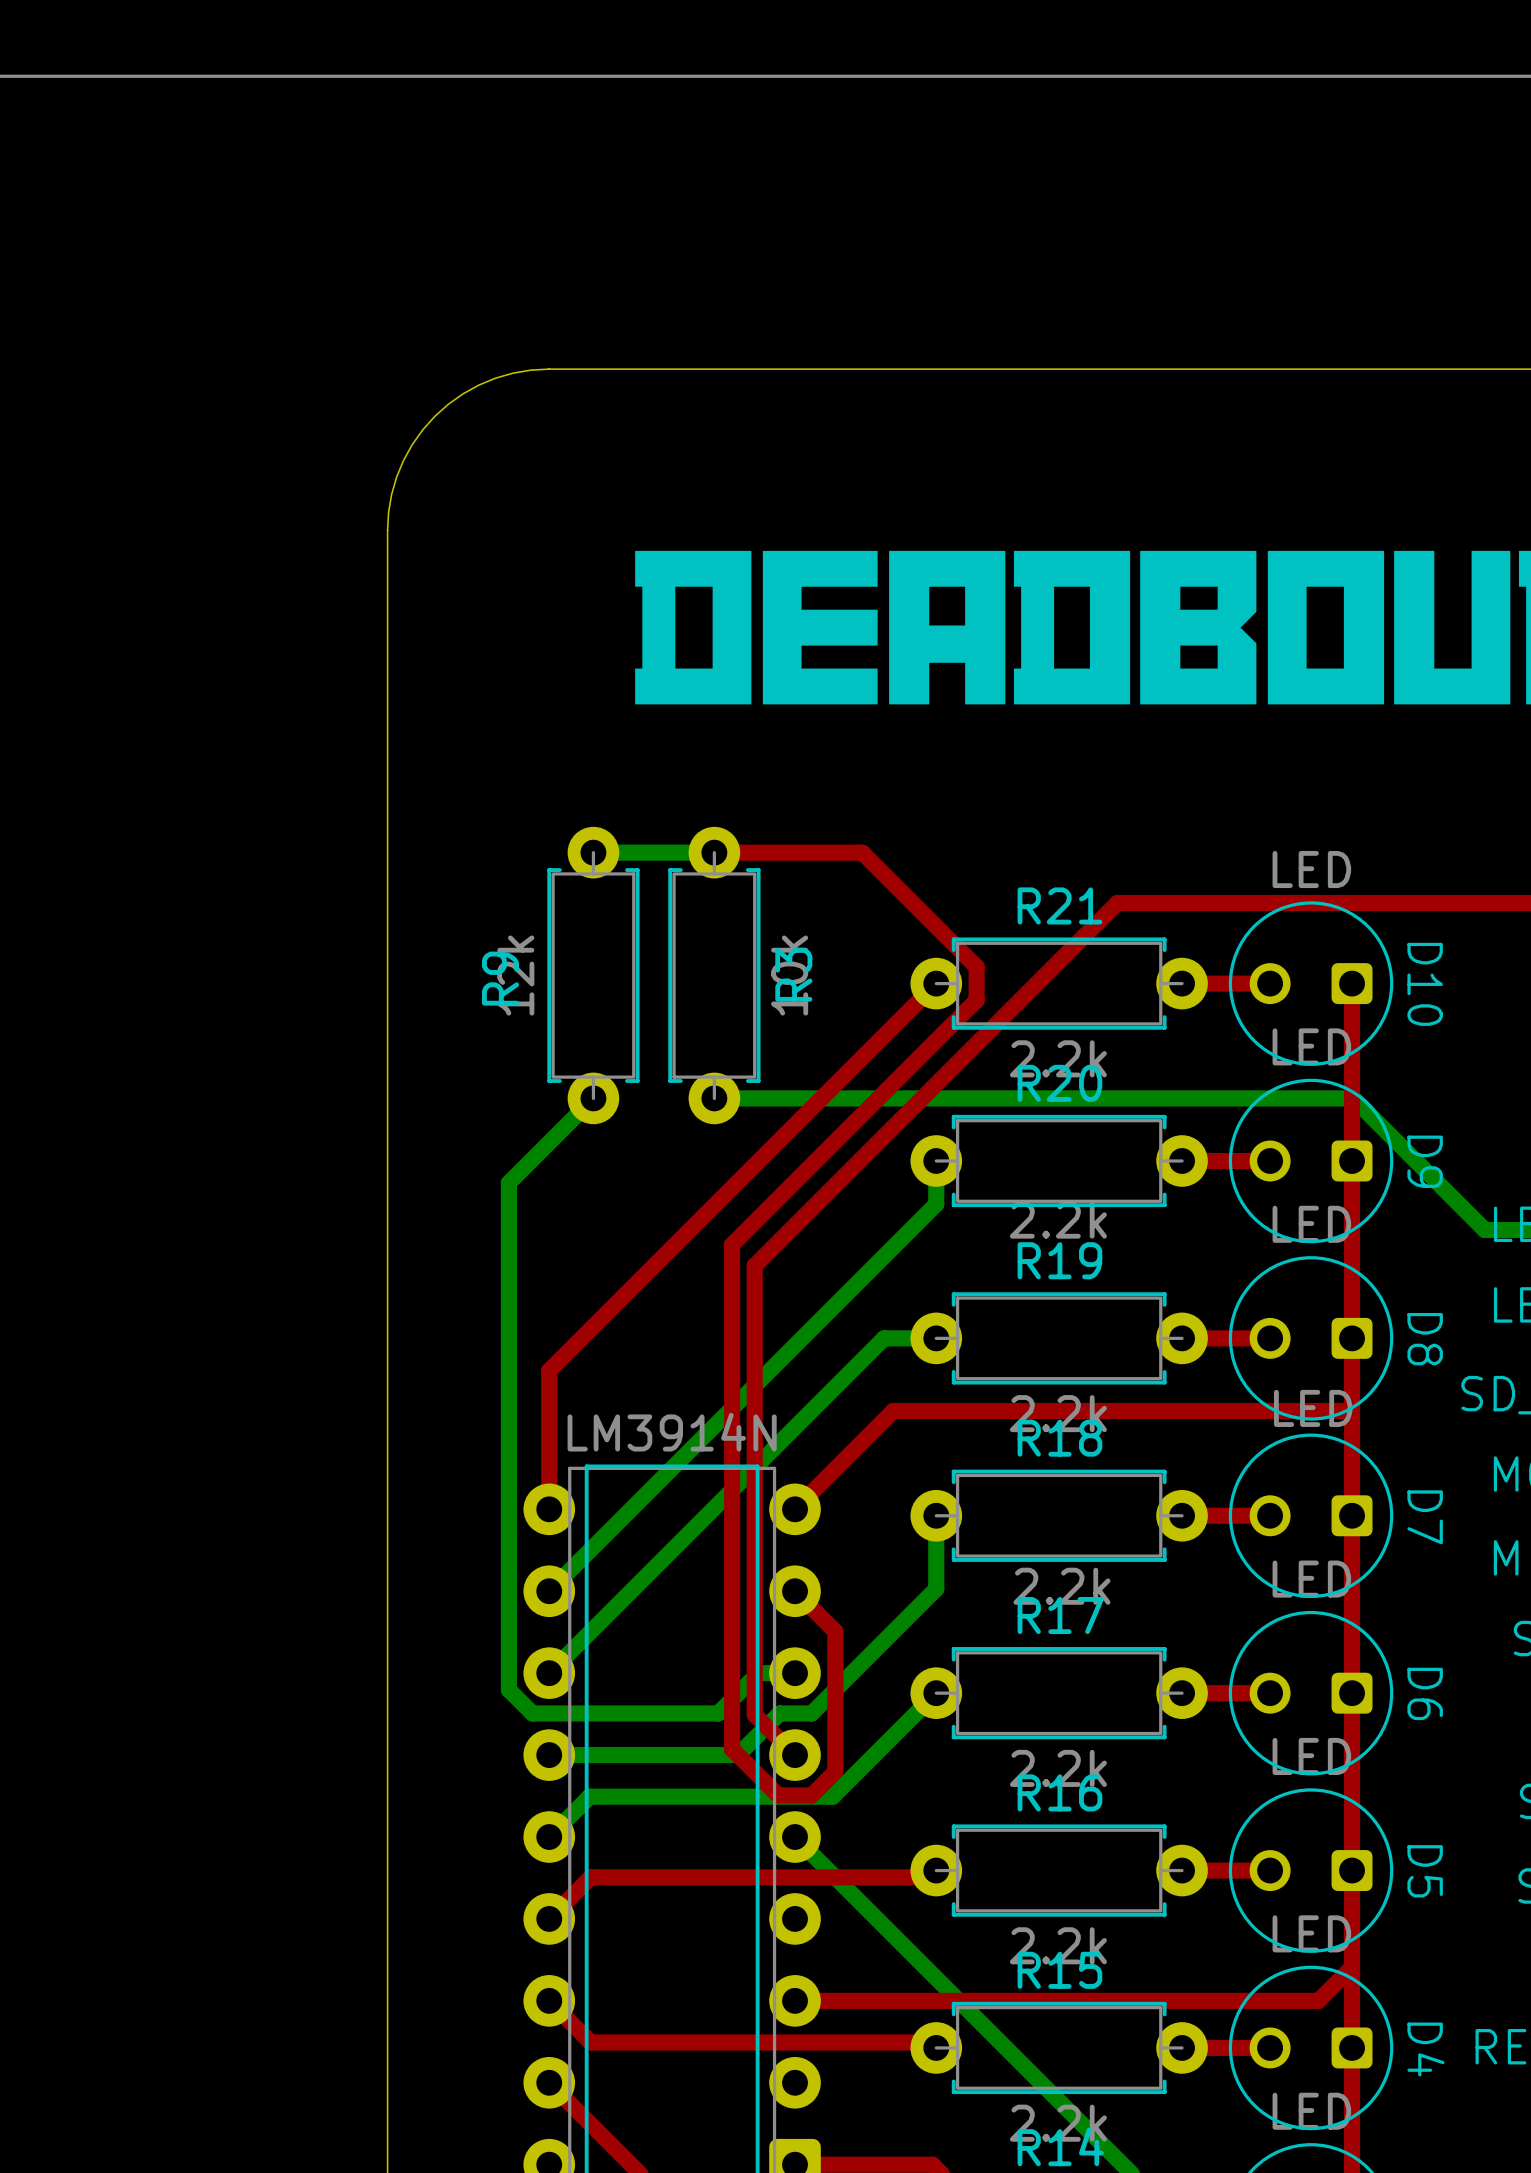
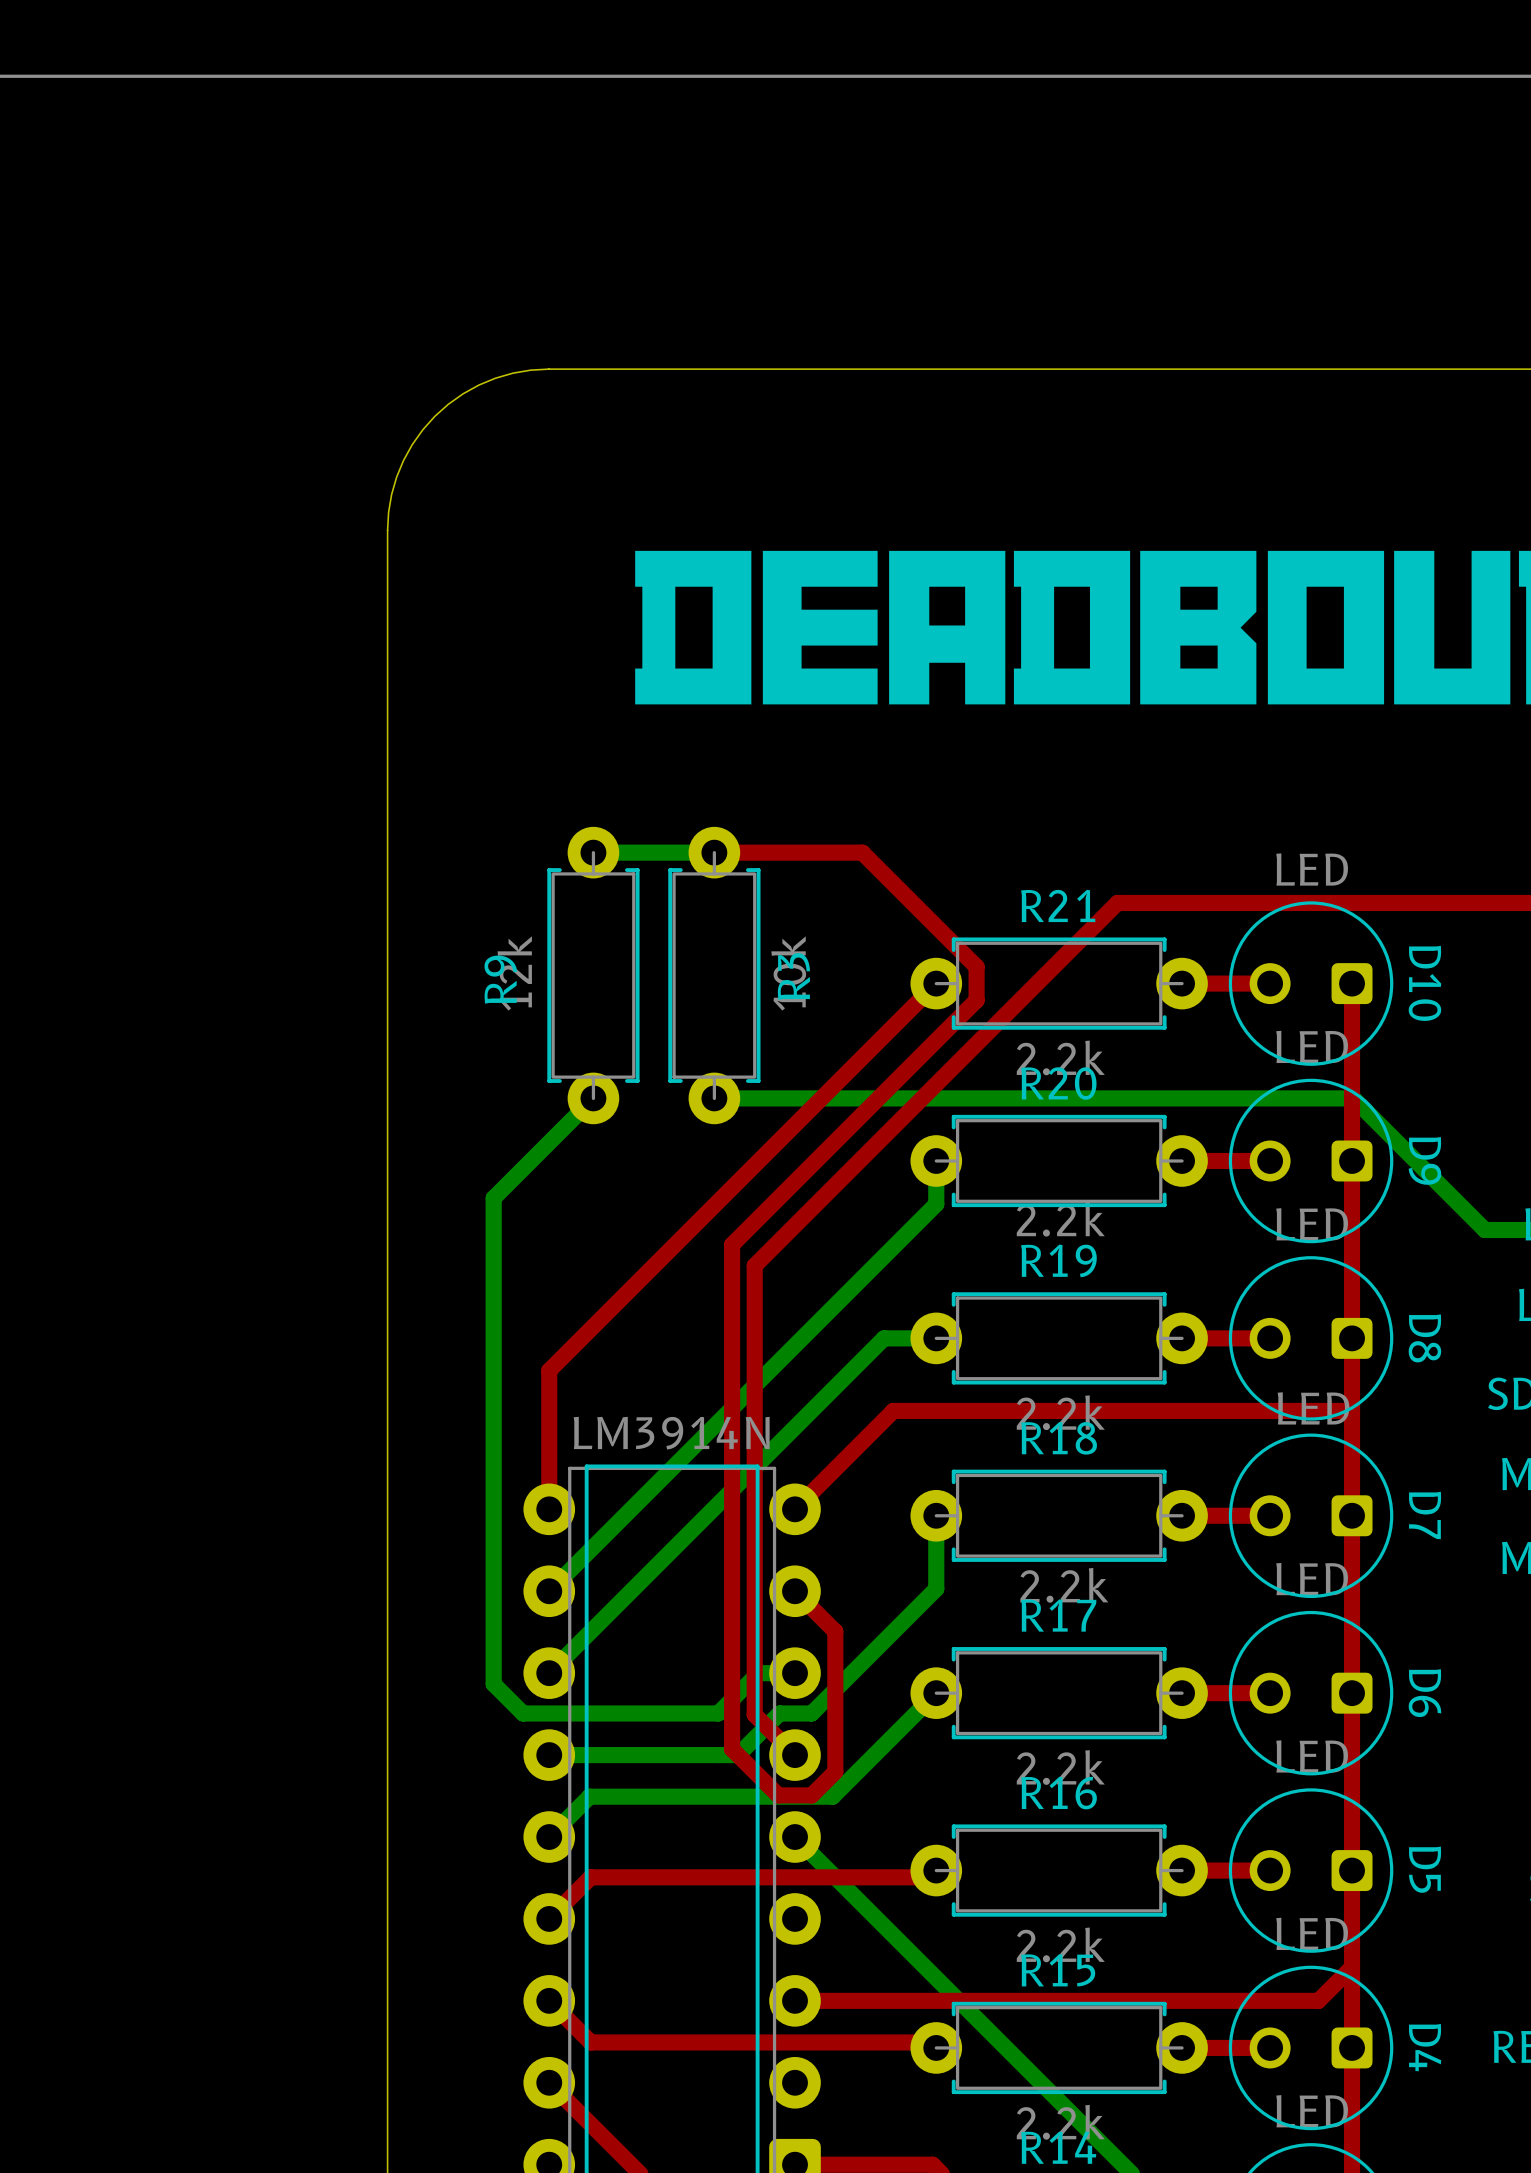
bottom track: (508, 1182) (508, 1689) (532, 1713) -> (508, 1182) (493, 1198) (493, 1684) (523, 1713) (532, 1713)

